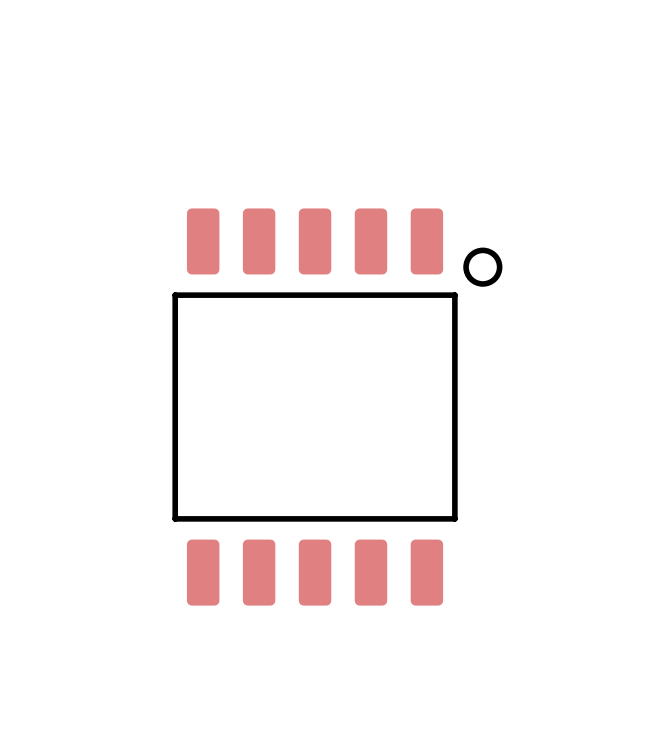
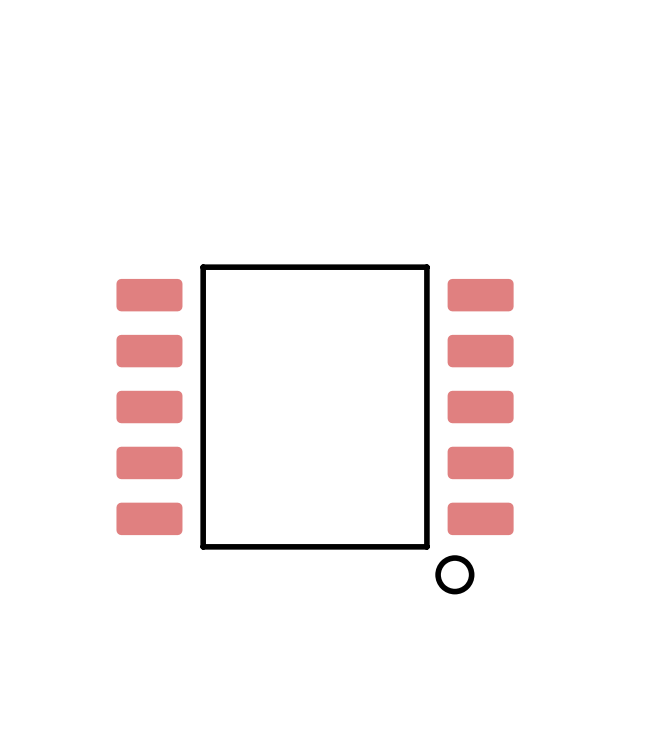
part rotation: 0° (337, 407) -> 90° clockwise (315, 429)

